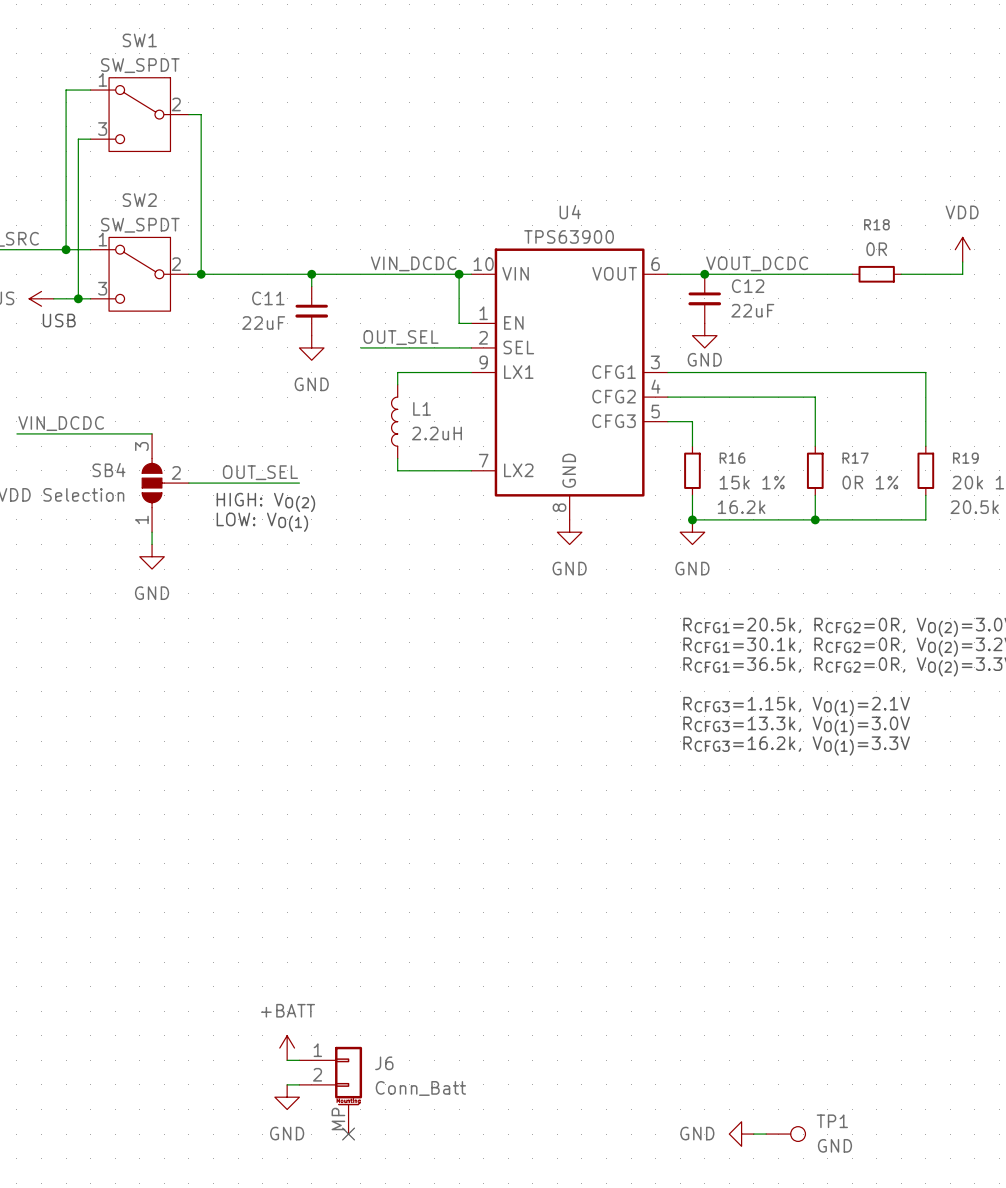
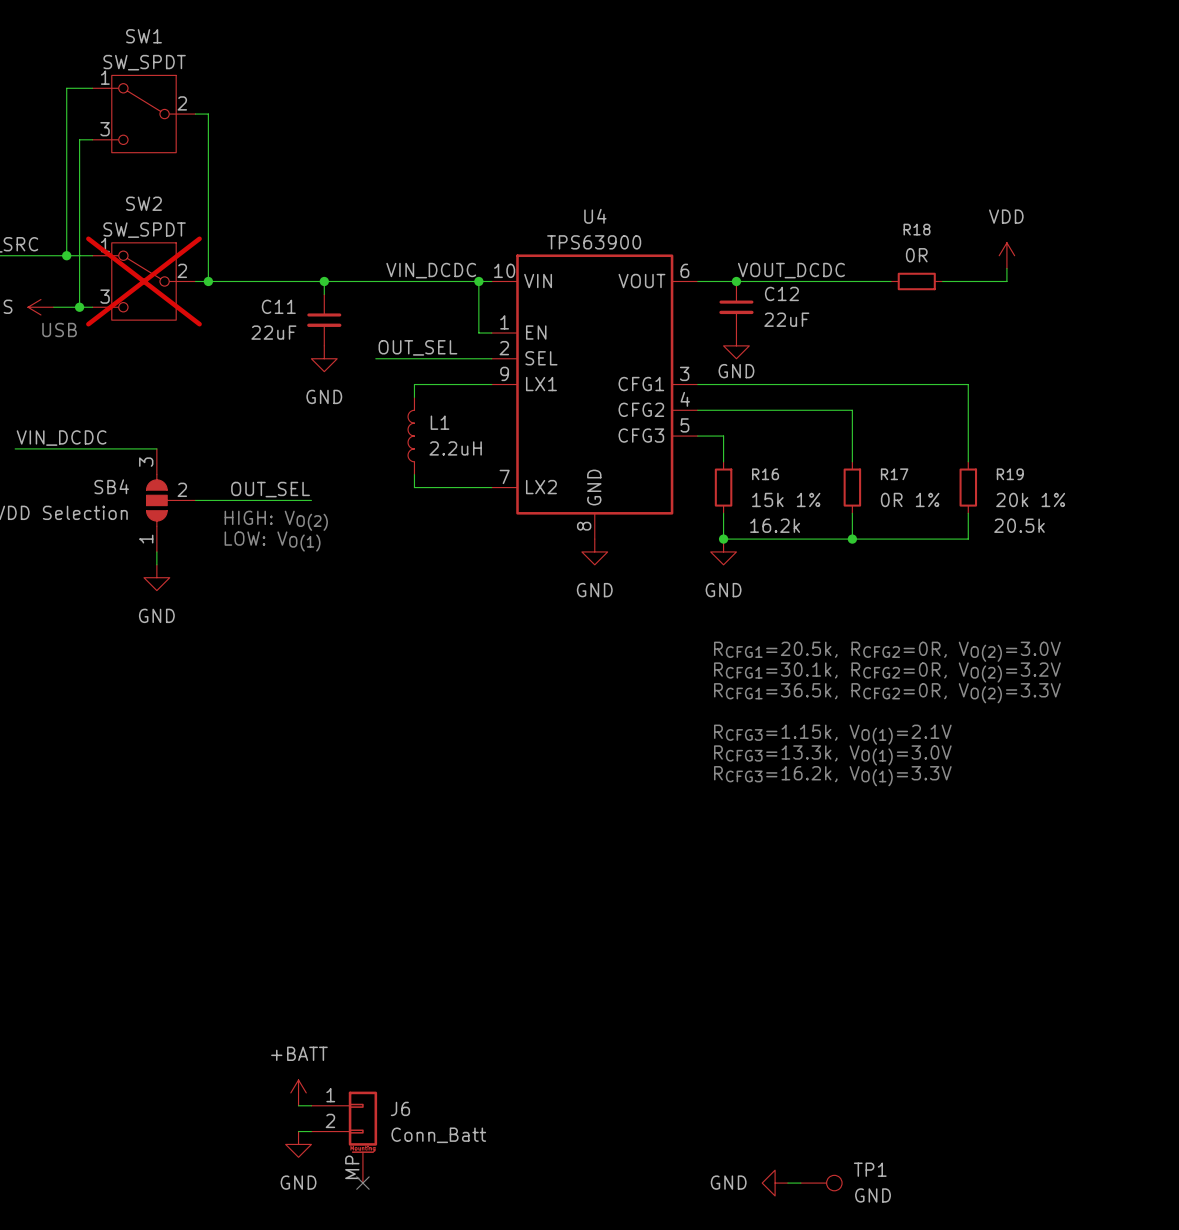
SW2 do-not-place cross: none -> (143, 281)

